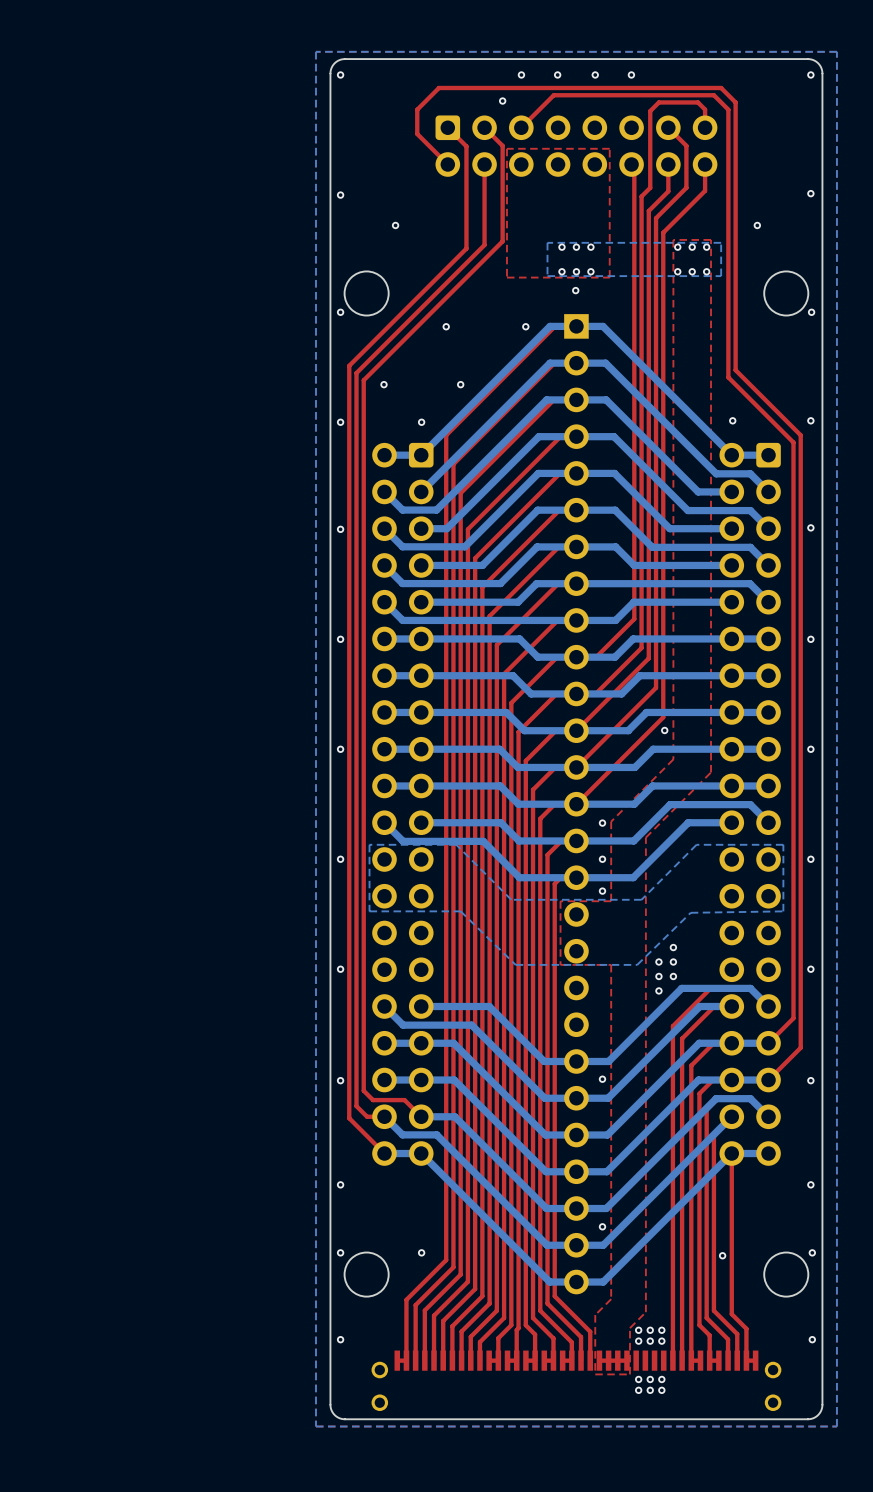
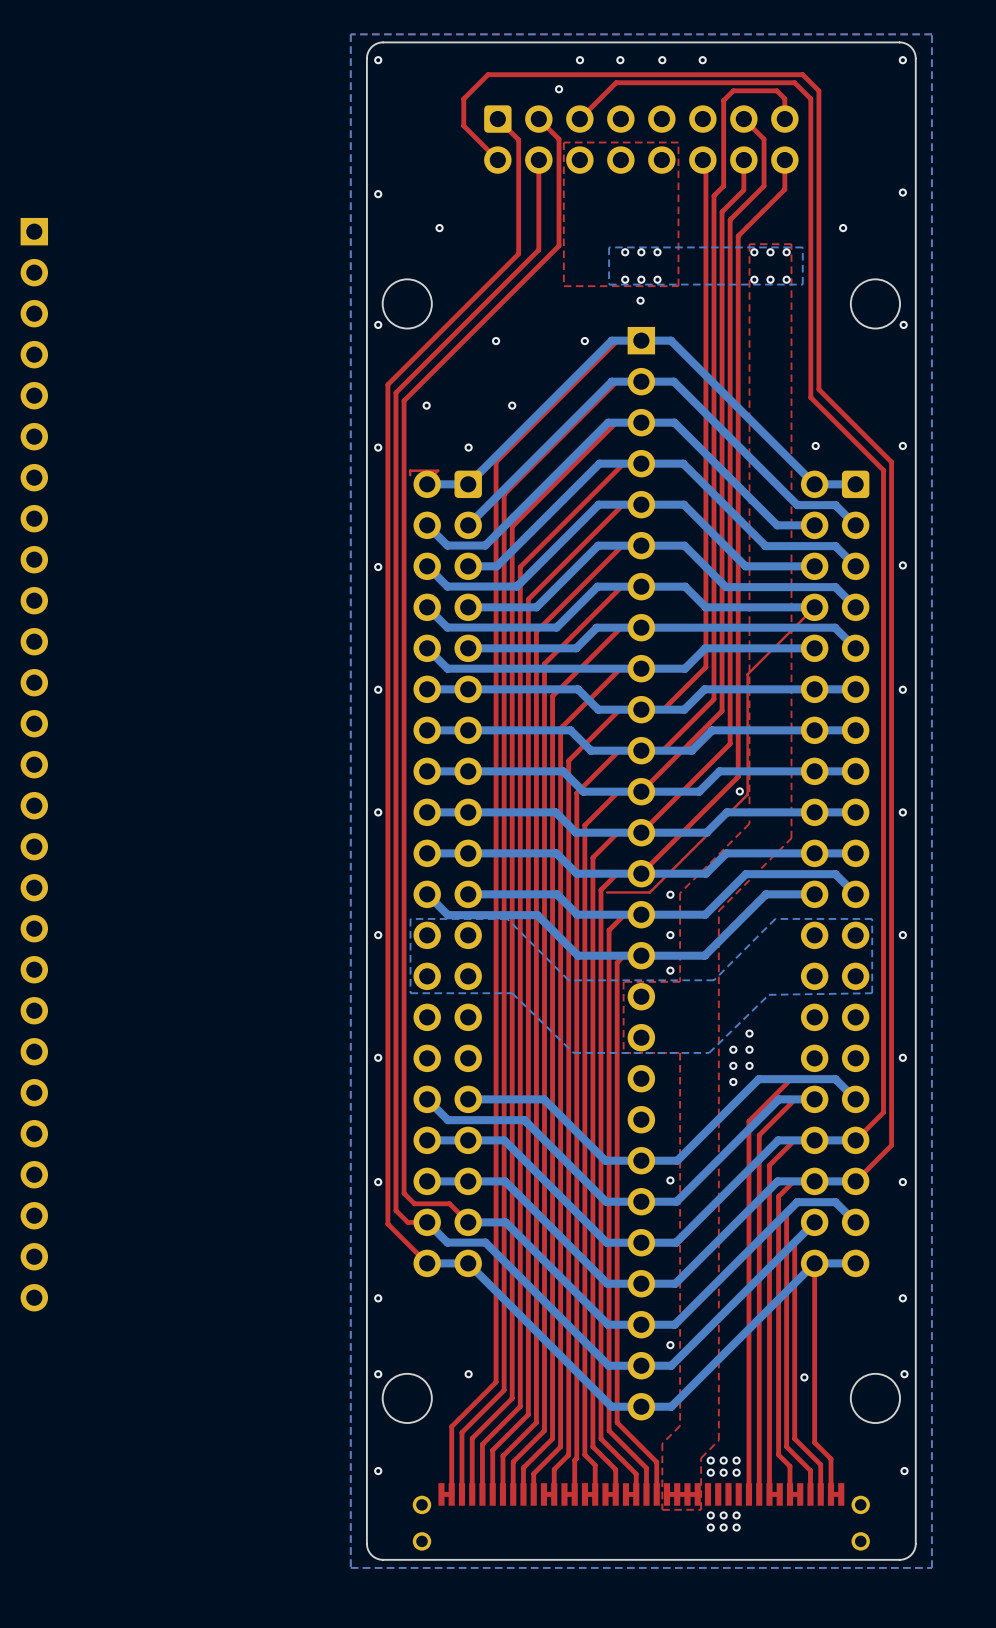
top track: none -> (410, 475) (410, 470) (438, 470) (427, 481) (427, 484)
top track: none -> (814, 607) (747, 674) (747, 794) (649, 892) (607, 892)
part: none -> (34, 764)

